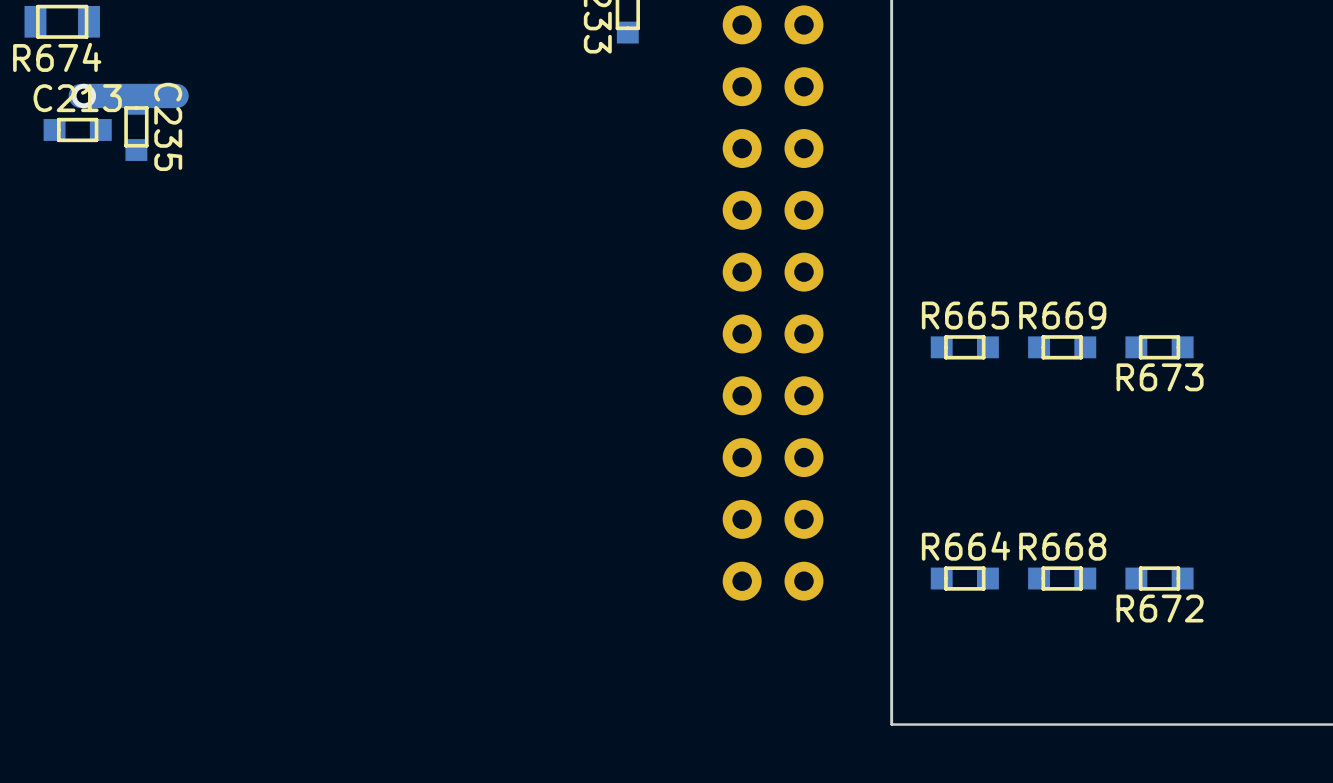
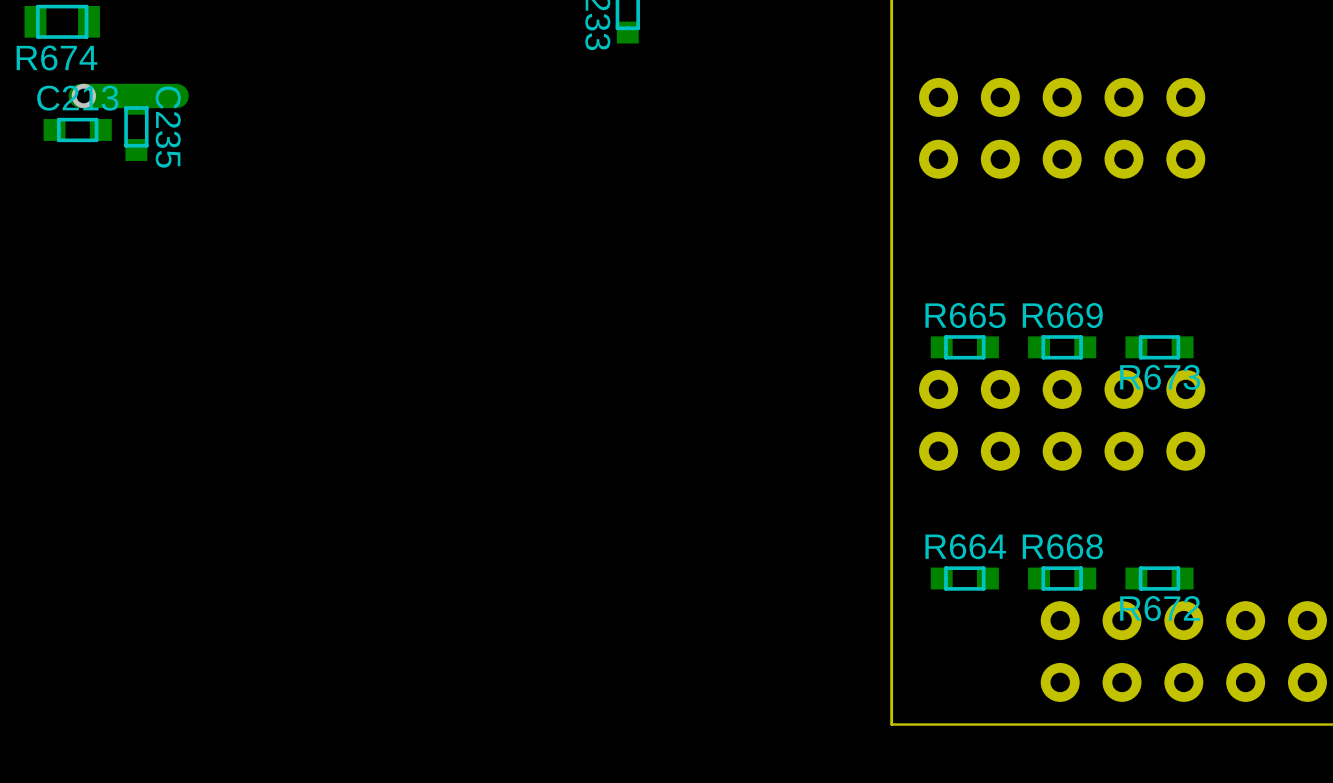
part: none -> (1062, 128)
part: (773, 148) -> none
part: none -> (1062, 420)
part: (773, 457) -> none
part: none -> (1183, 651)

